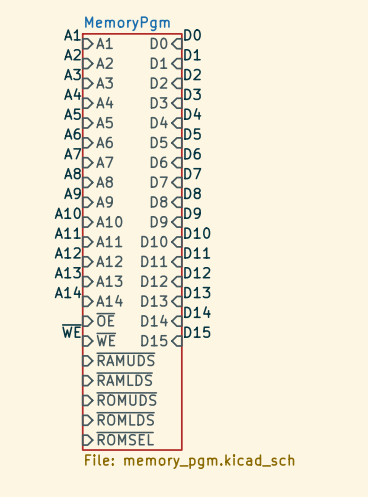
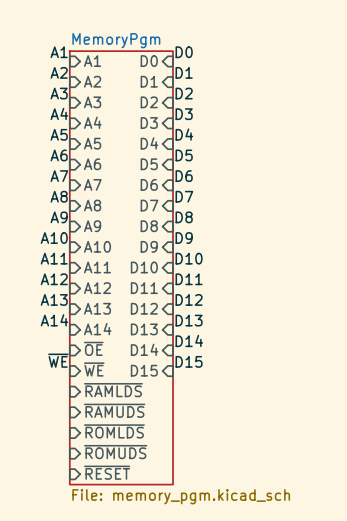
sheet pin: ~{RAMUDS} (125, 359) -> ~{RAMLDS} (113, 390)
sheet pin: ~{RAMLDS} (124, 379) -> ~{RAMUDS} (114, 410)
sheet pin: ~{ROMUDS} (126, 398) -> ~{ROMLDS} (114, 431)
sheet pin: ~{ROMLDS} (125, 418) -> ~{ROMUDS} (115, 452)
sheet pin: ~{ROMSEL} (125, 438) -> ~{RESET} (107, 472)

